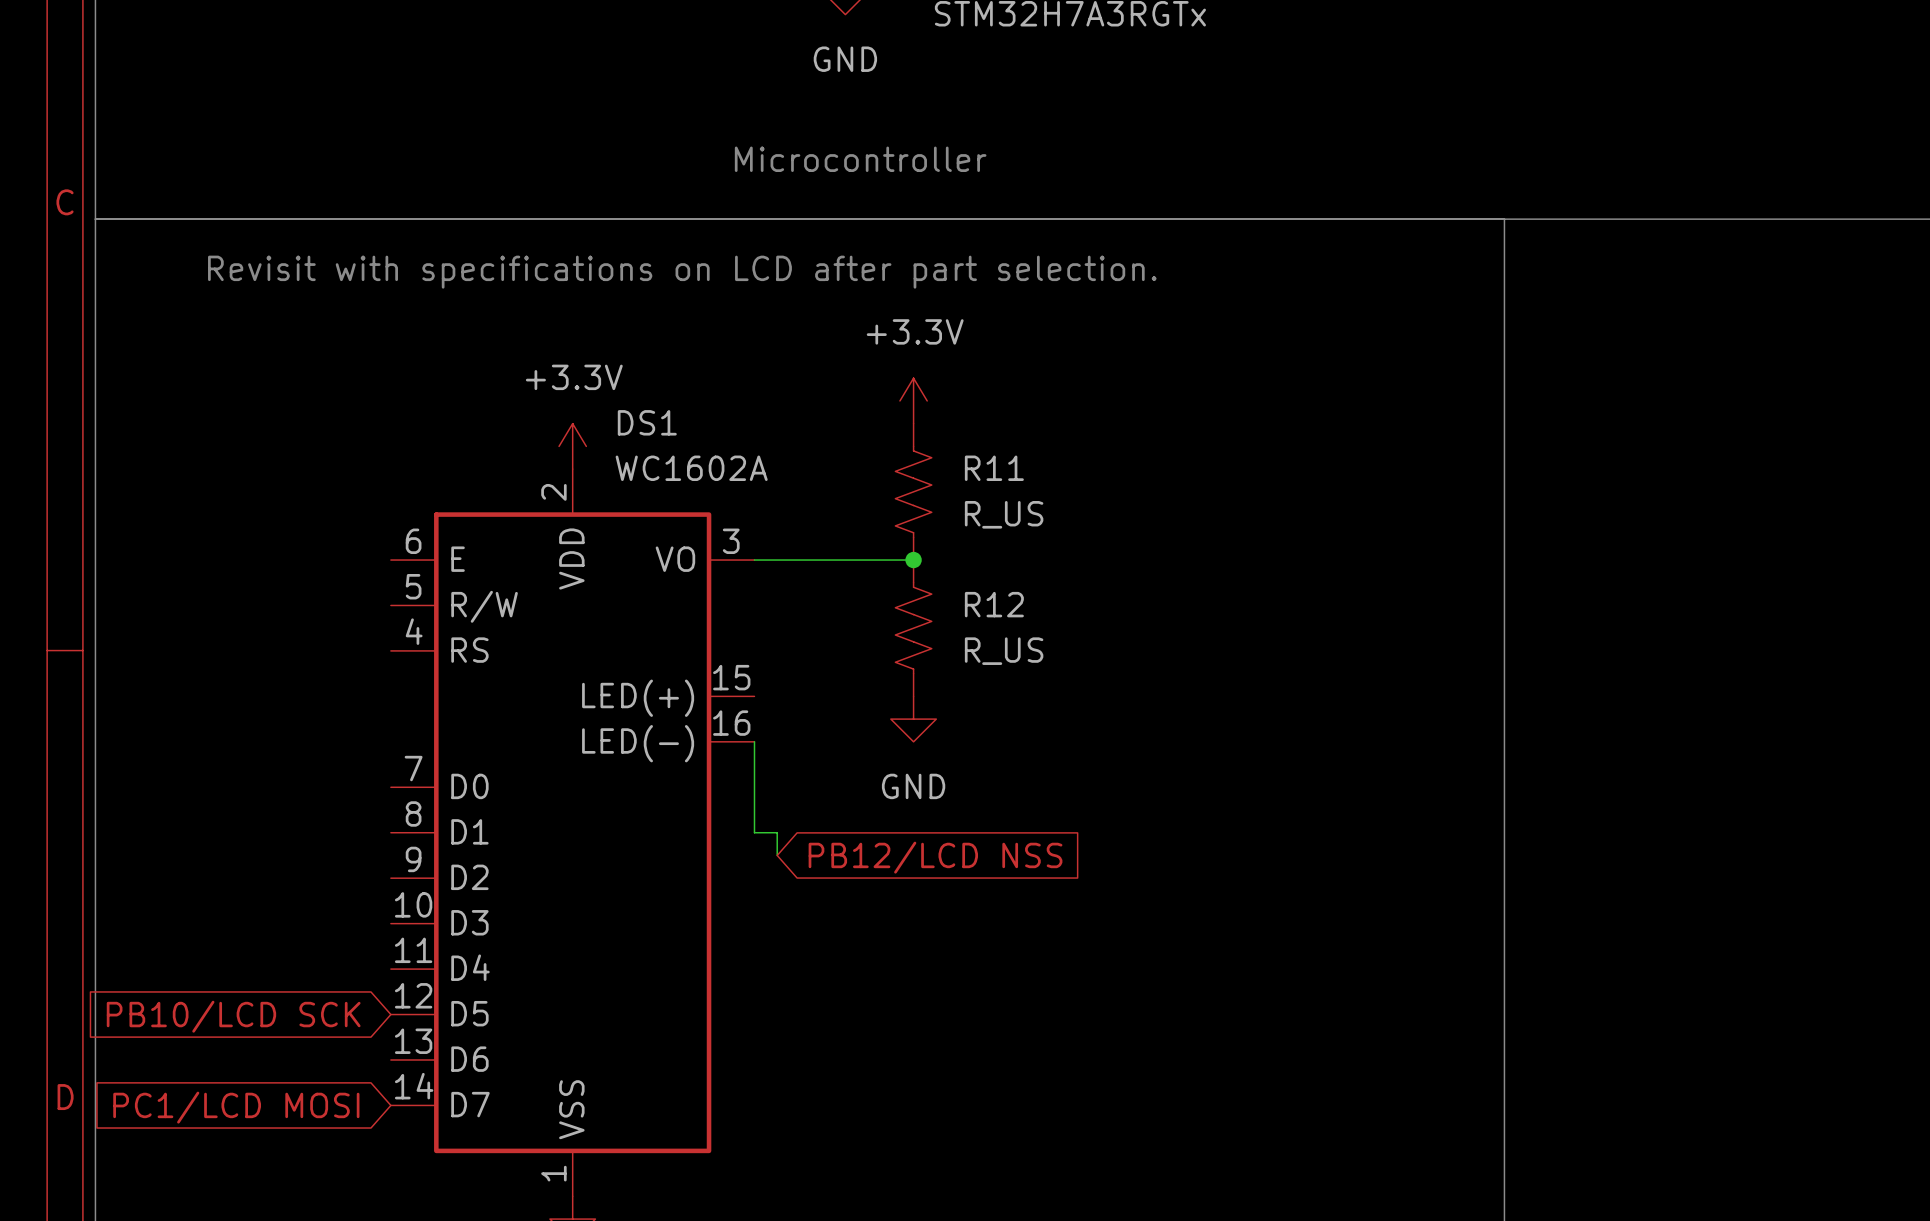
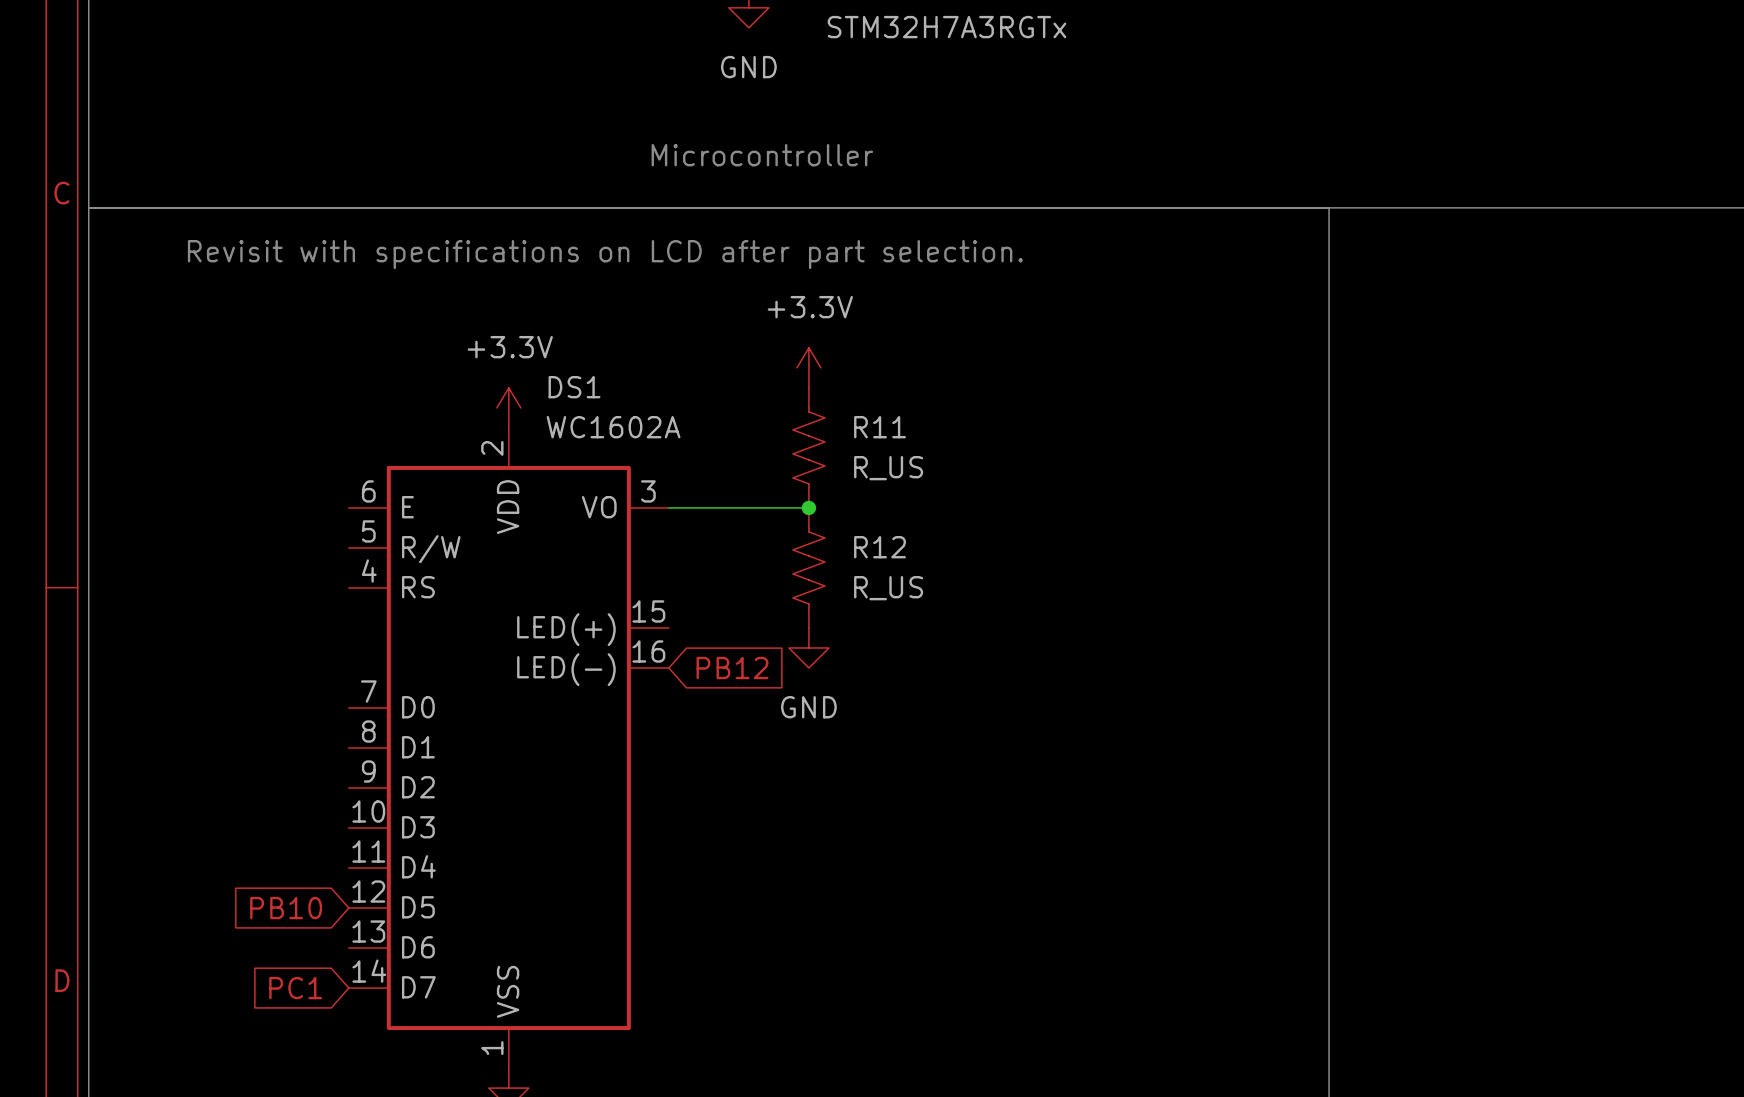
wire: (754, 741) (754, 832) (777, 832) (777, 855) -> none
global label: none -> PB12 (732, 667)
global label: PB12/LCD NSS (935, 857) -> none
global label: PB10/LCD SCK (233, 1016) -> PB10 (286, 908)
global label: PC1/LCD MOSI (236, 1107) -> PC1 (295, 988)

